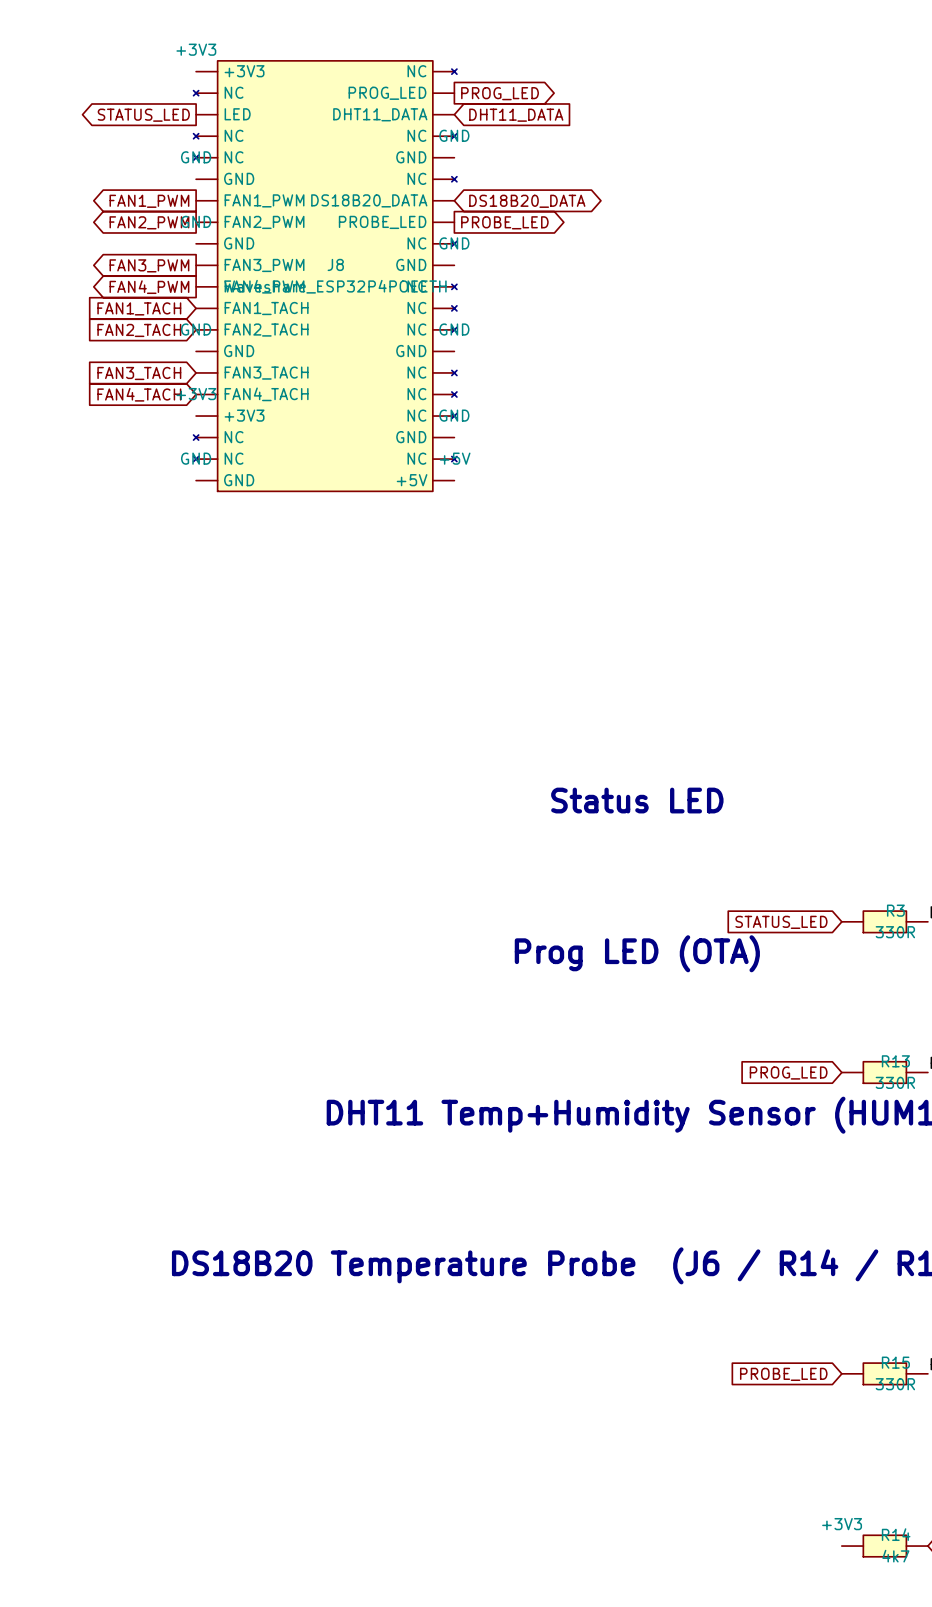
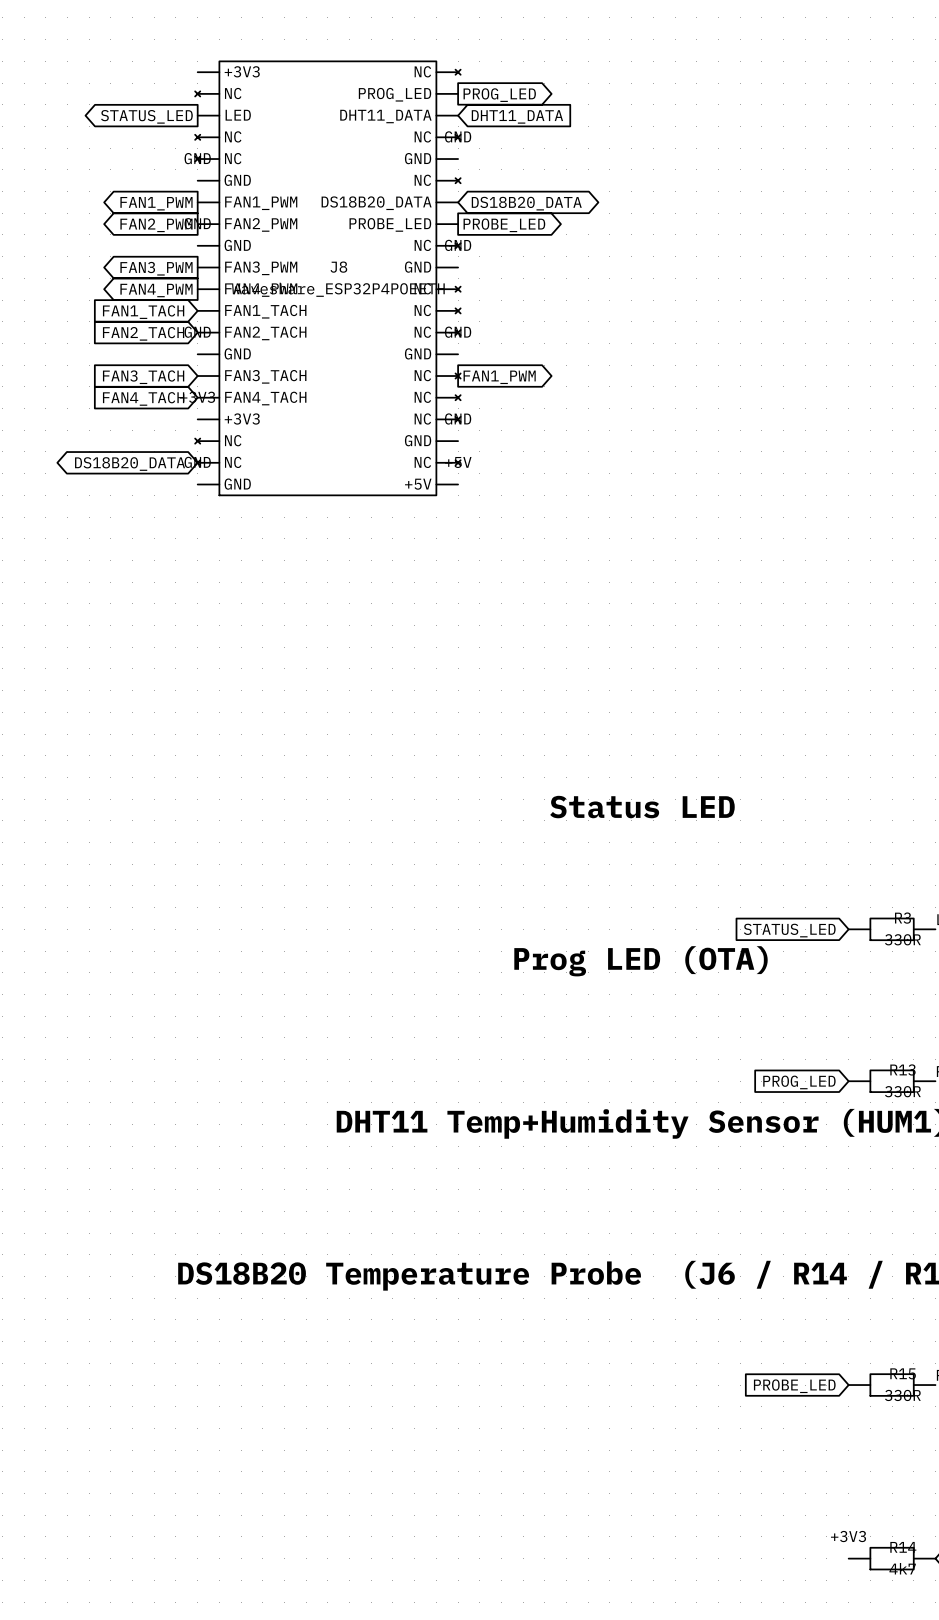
power symbol: +3V3 (196, 49) -> none
global label: none -> FAN1_PWM (499, 377)
global label: none -> DS18B20_DATA (130, 464)

